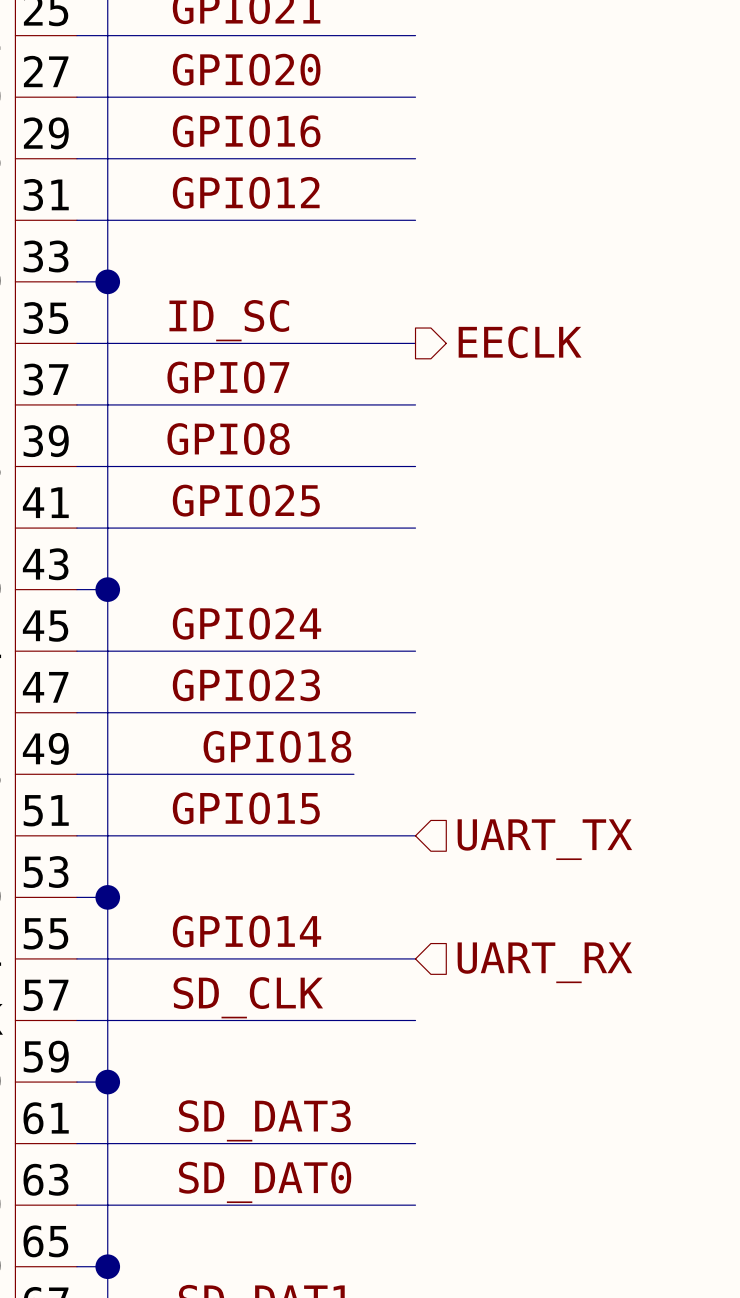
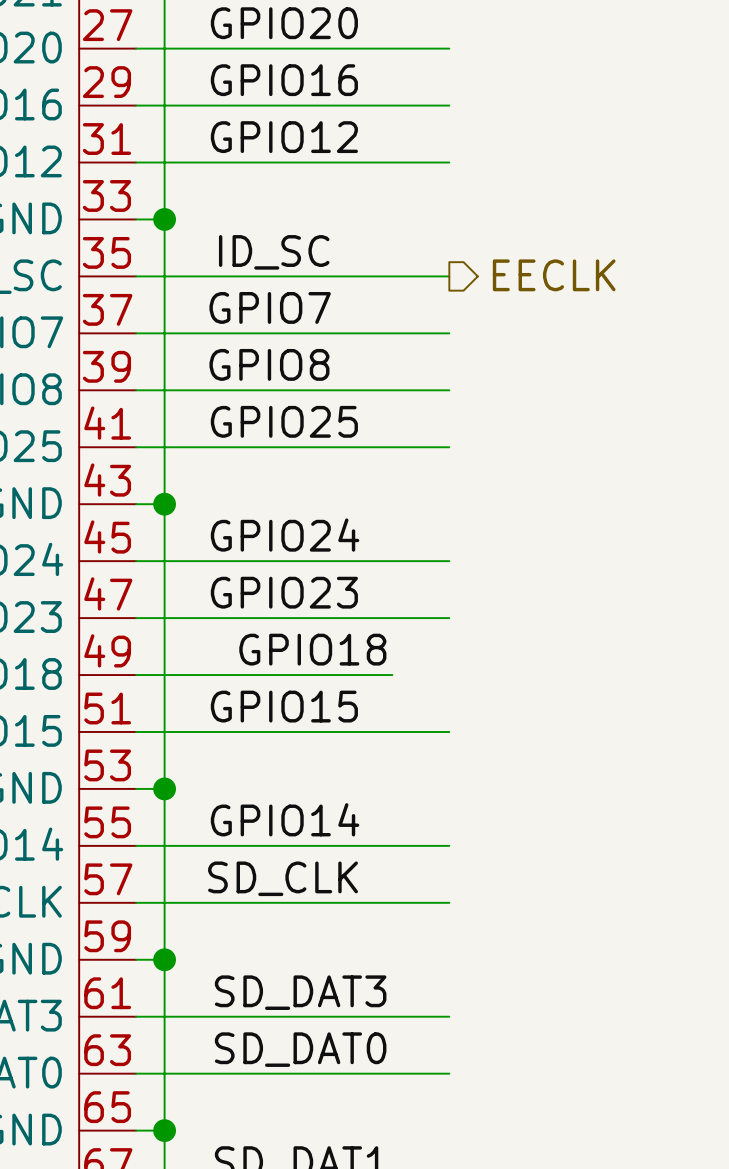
hierarchical label: UART_TX (544, 839) -> none
hierarchical label: UART_RX (544, 962) -> none

